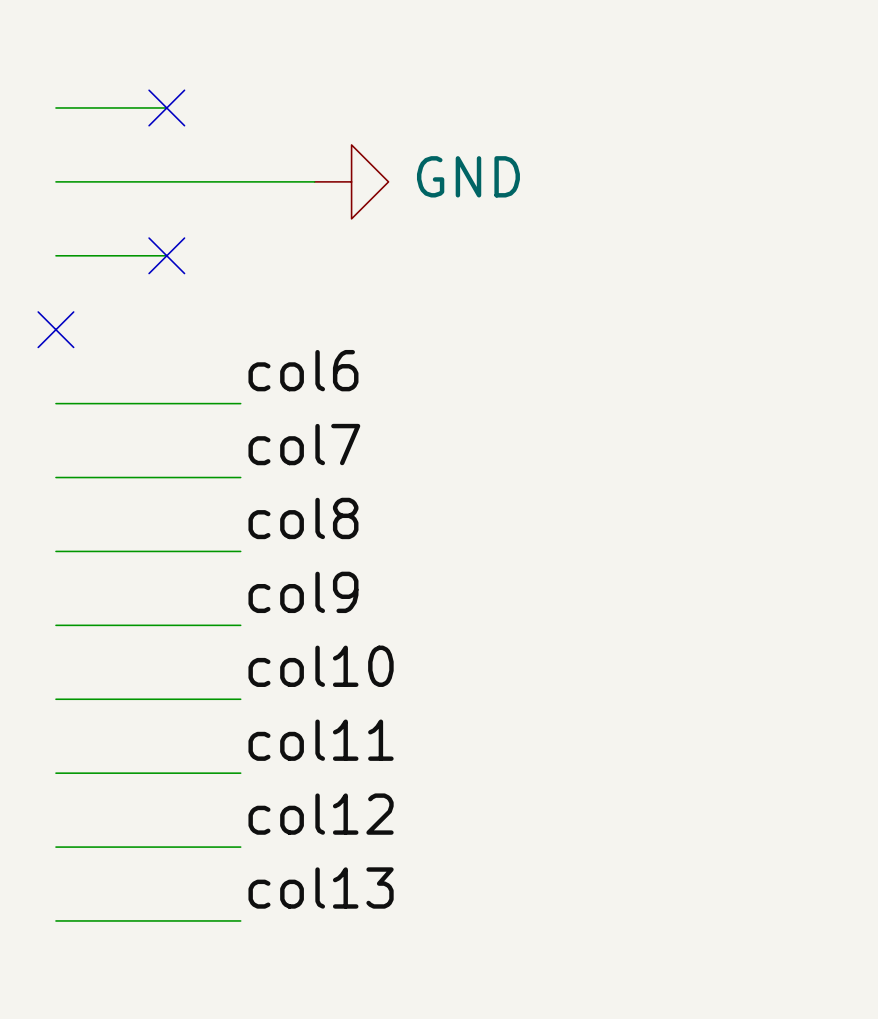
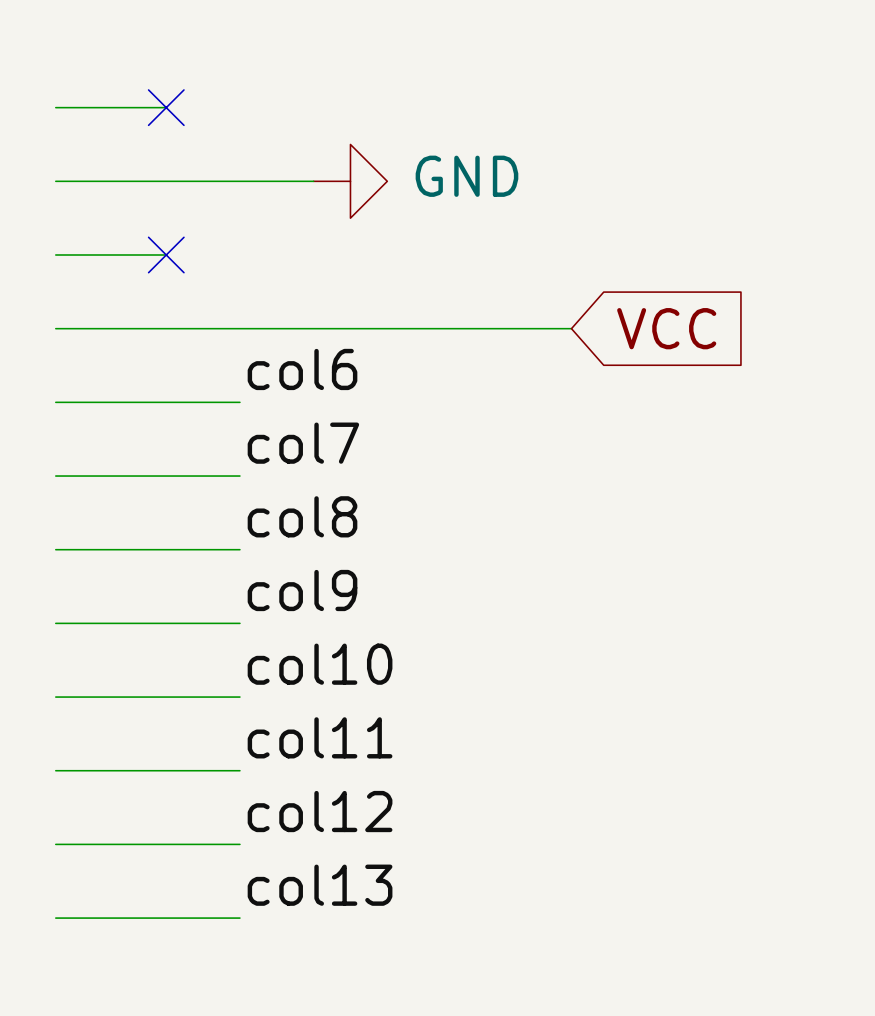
wire: none -> (55, 328) (571, 328)
no-connect mark: (55, 329) -> none
global label: none -> VCC (666, 328)

